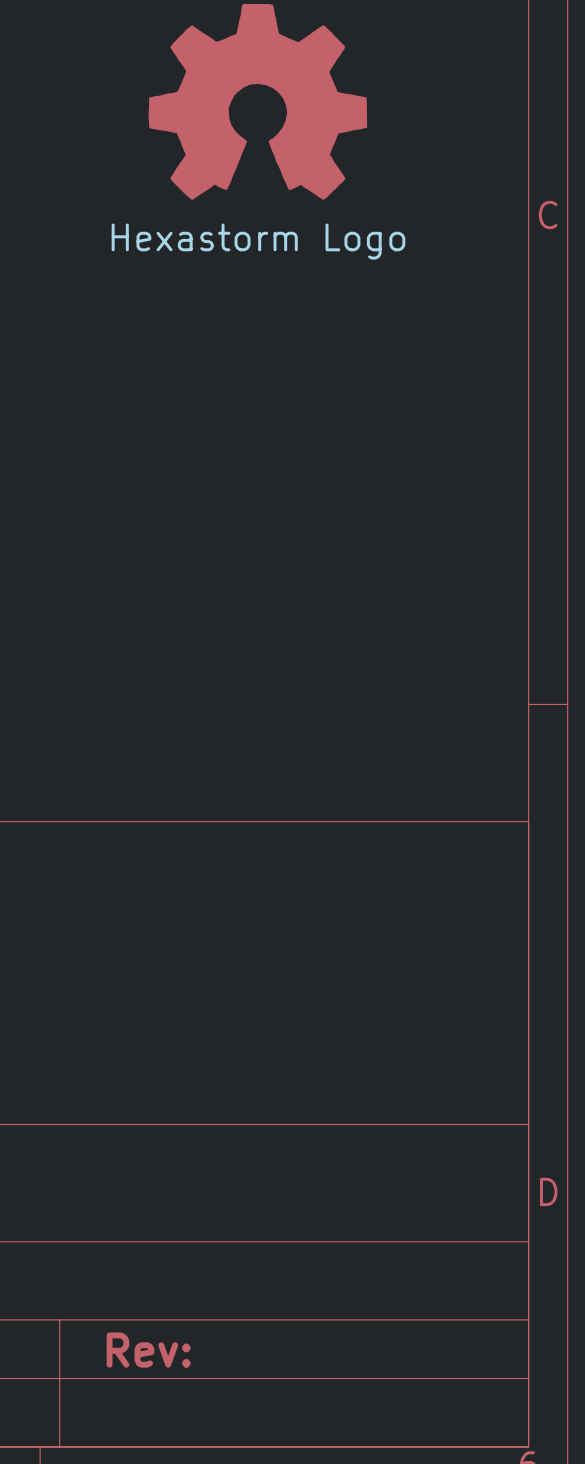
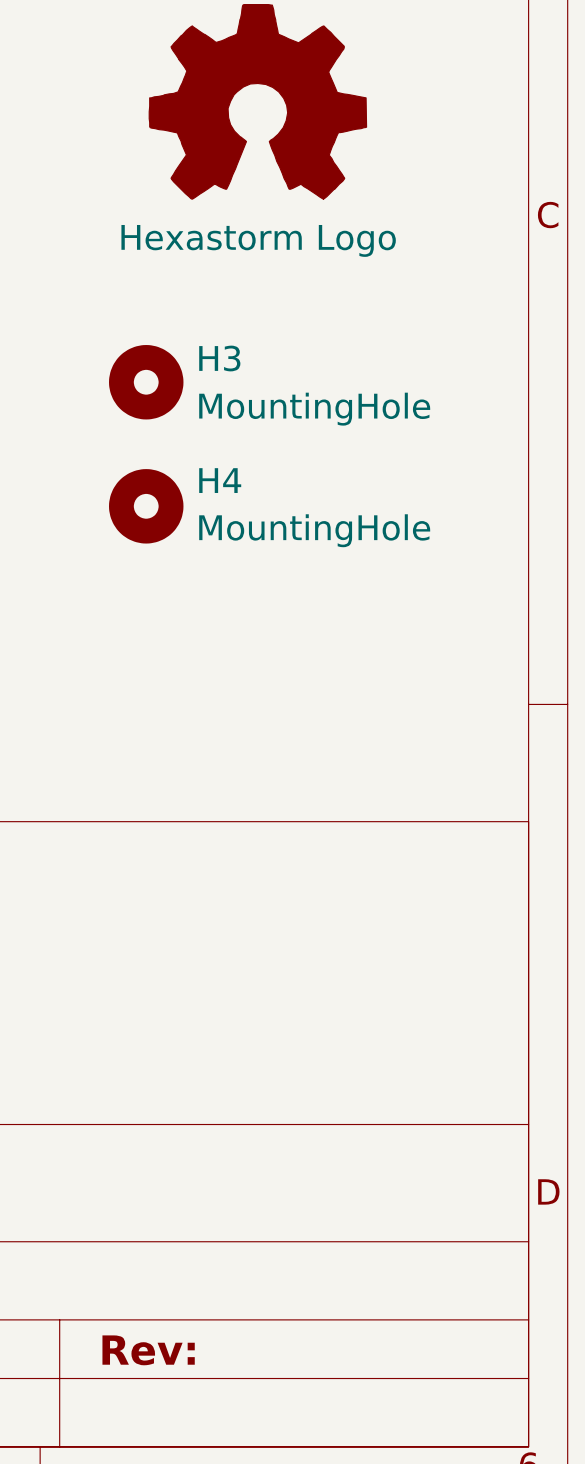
H3: none -> MountingHole (146, 382)
H4: none -> MountingHole (146, 506)

